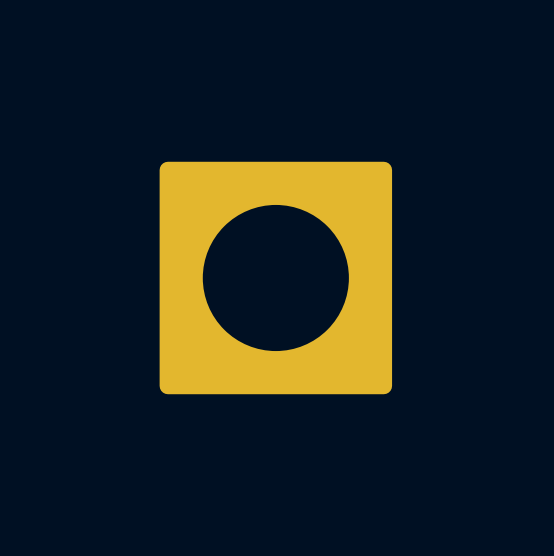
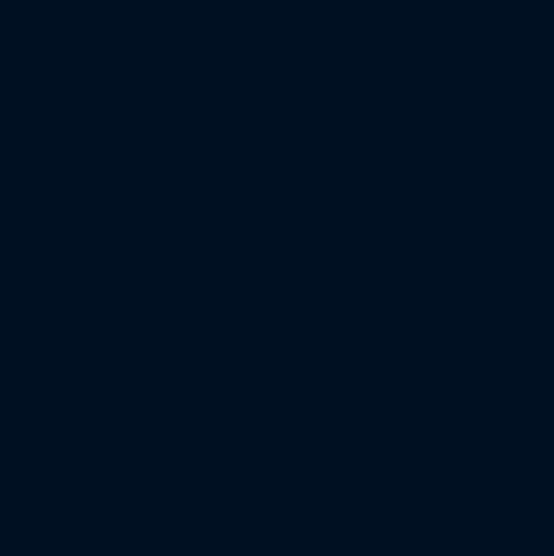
part: (275, 278) -> none

